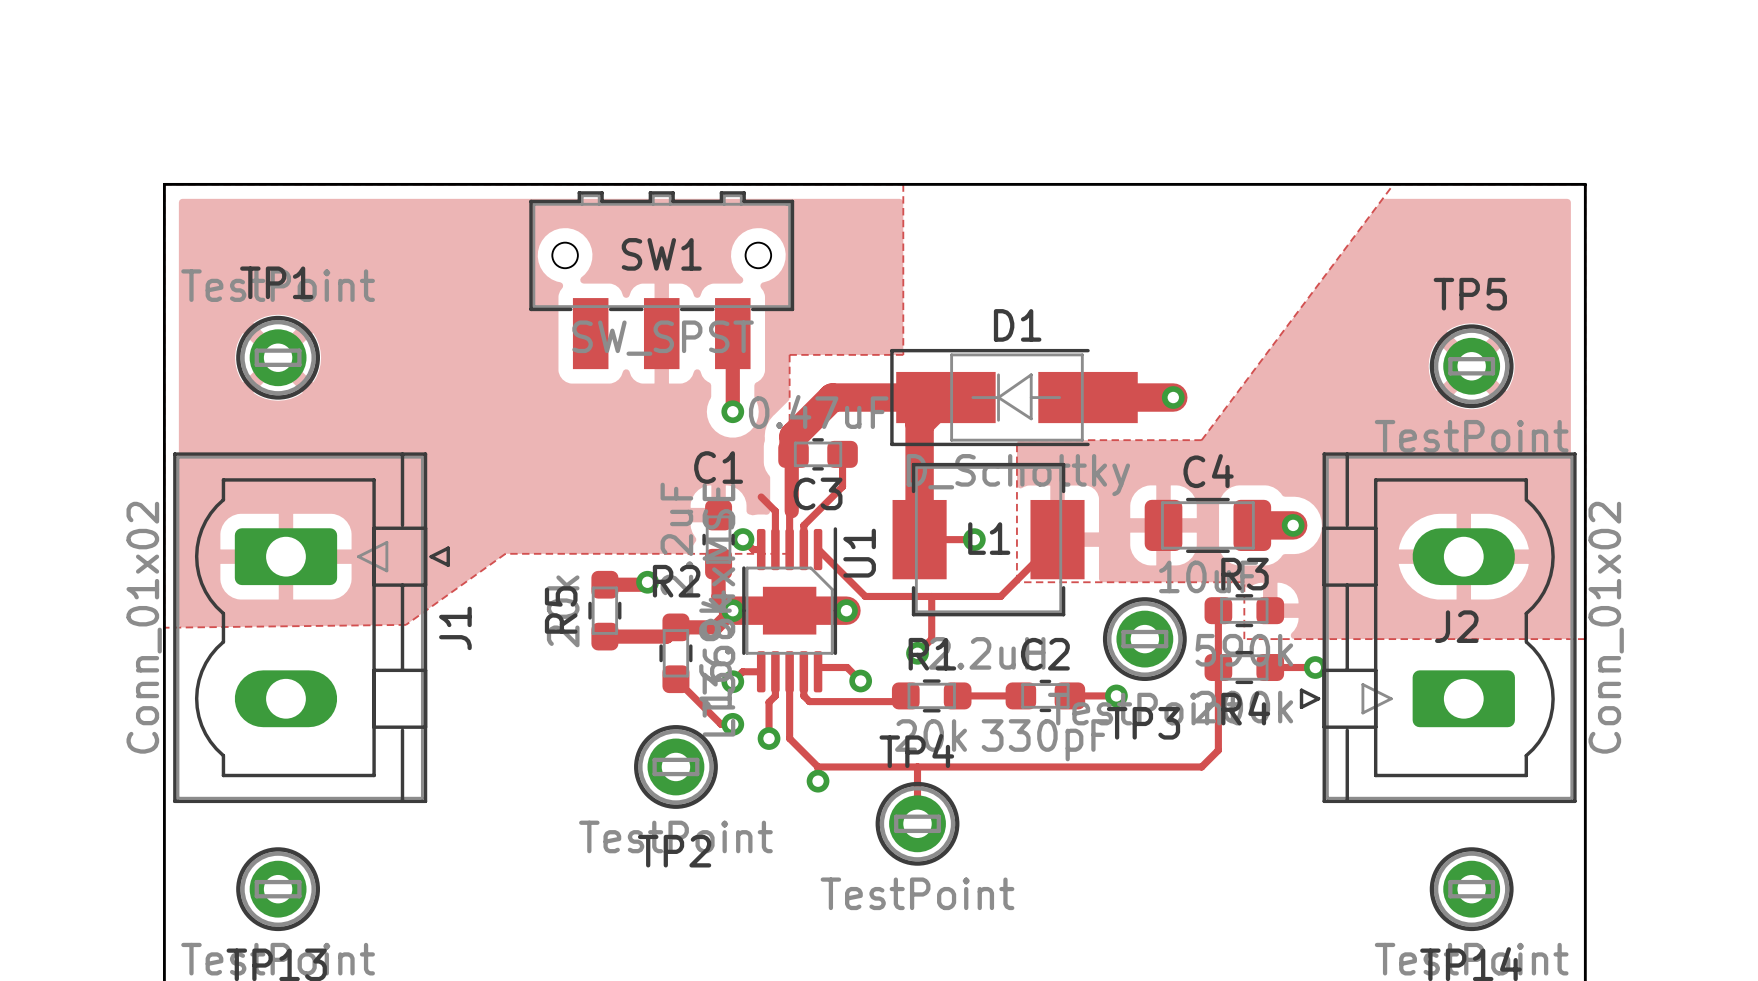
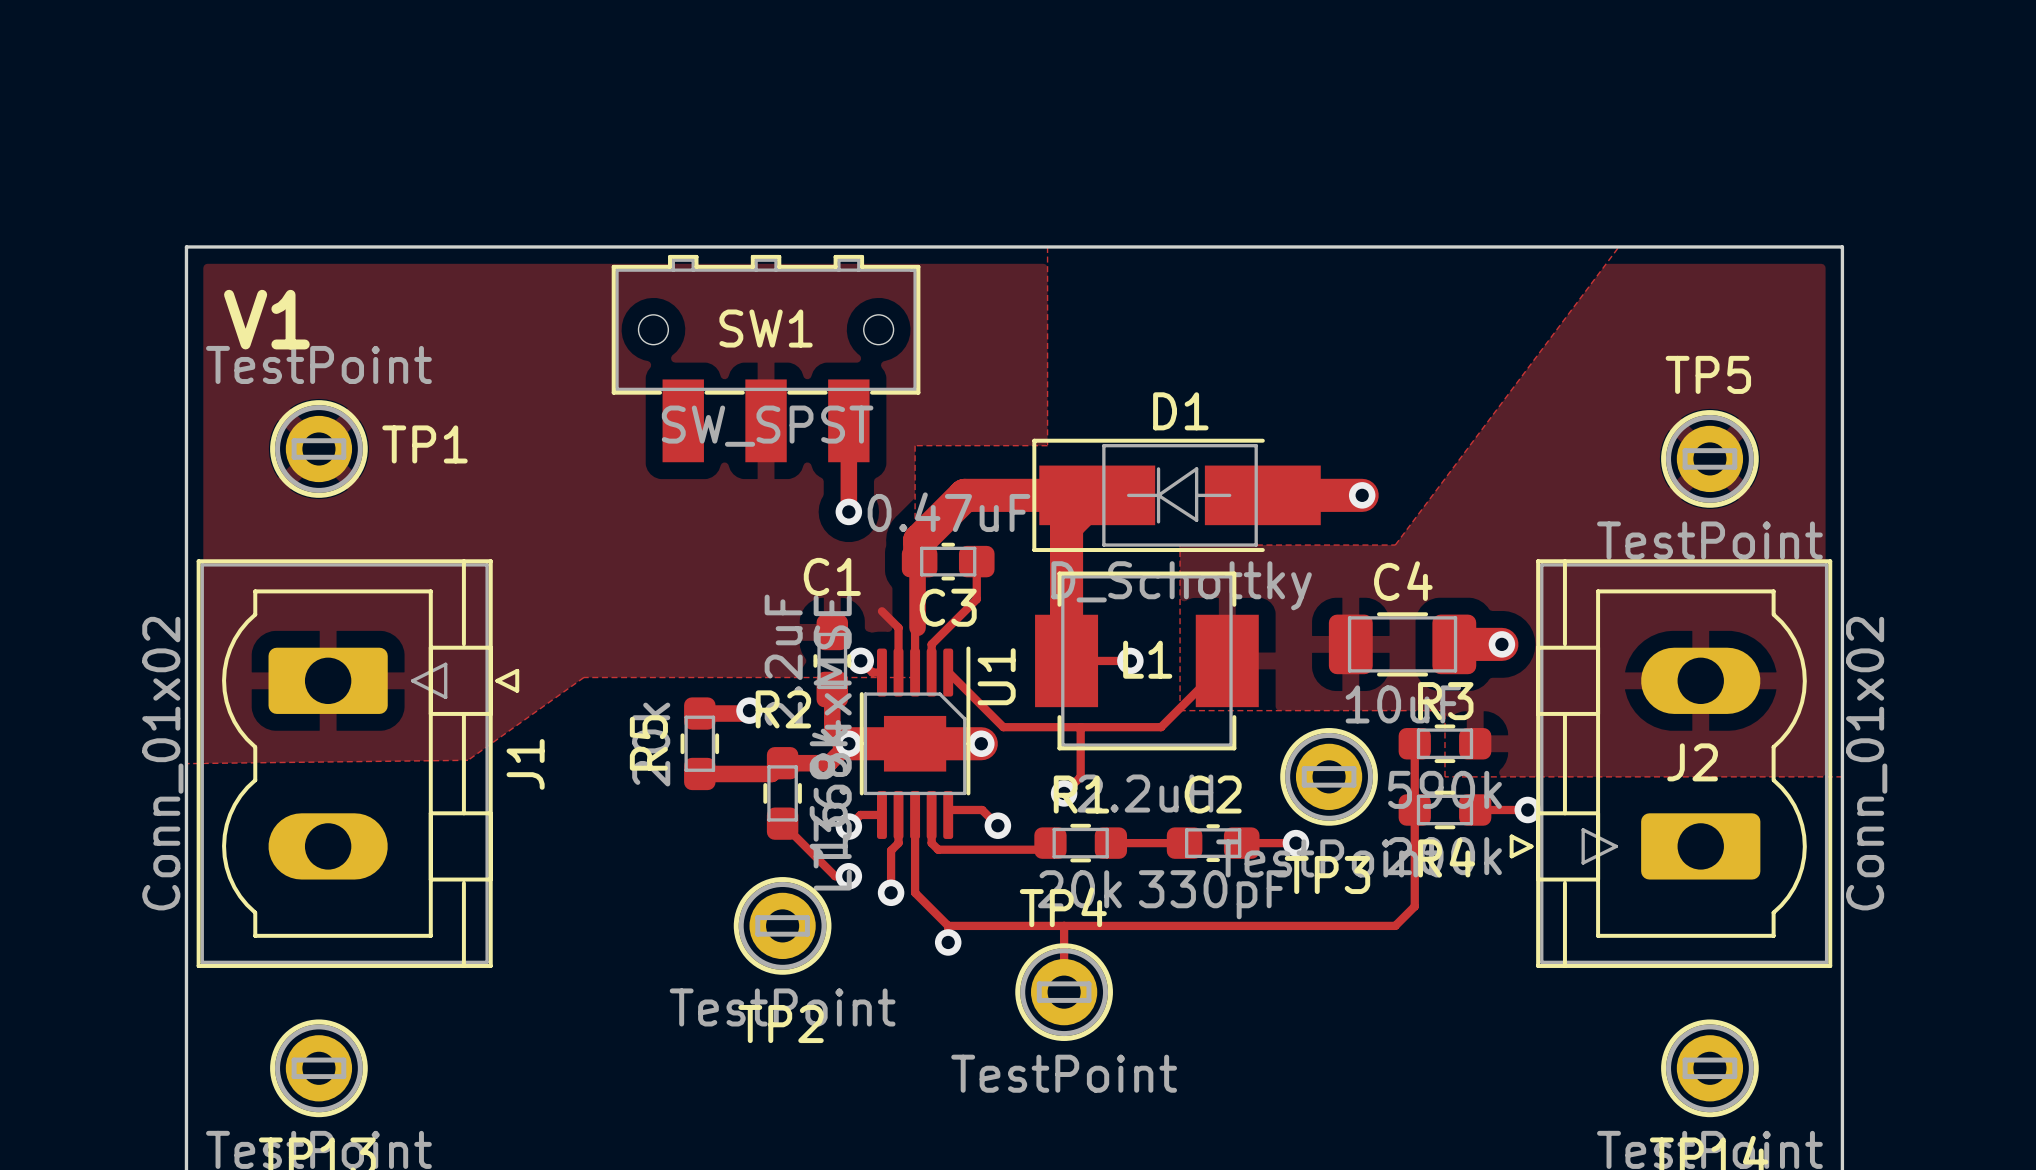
text: none -> V1 (266, 319)
TP1 name position: TP1 (276, 282) -> TP1 (425, 444)

